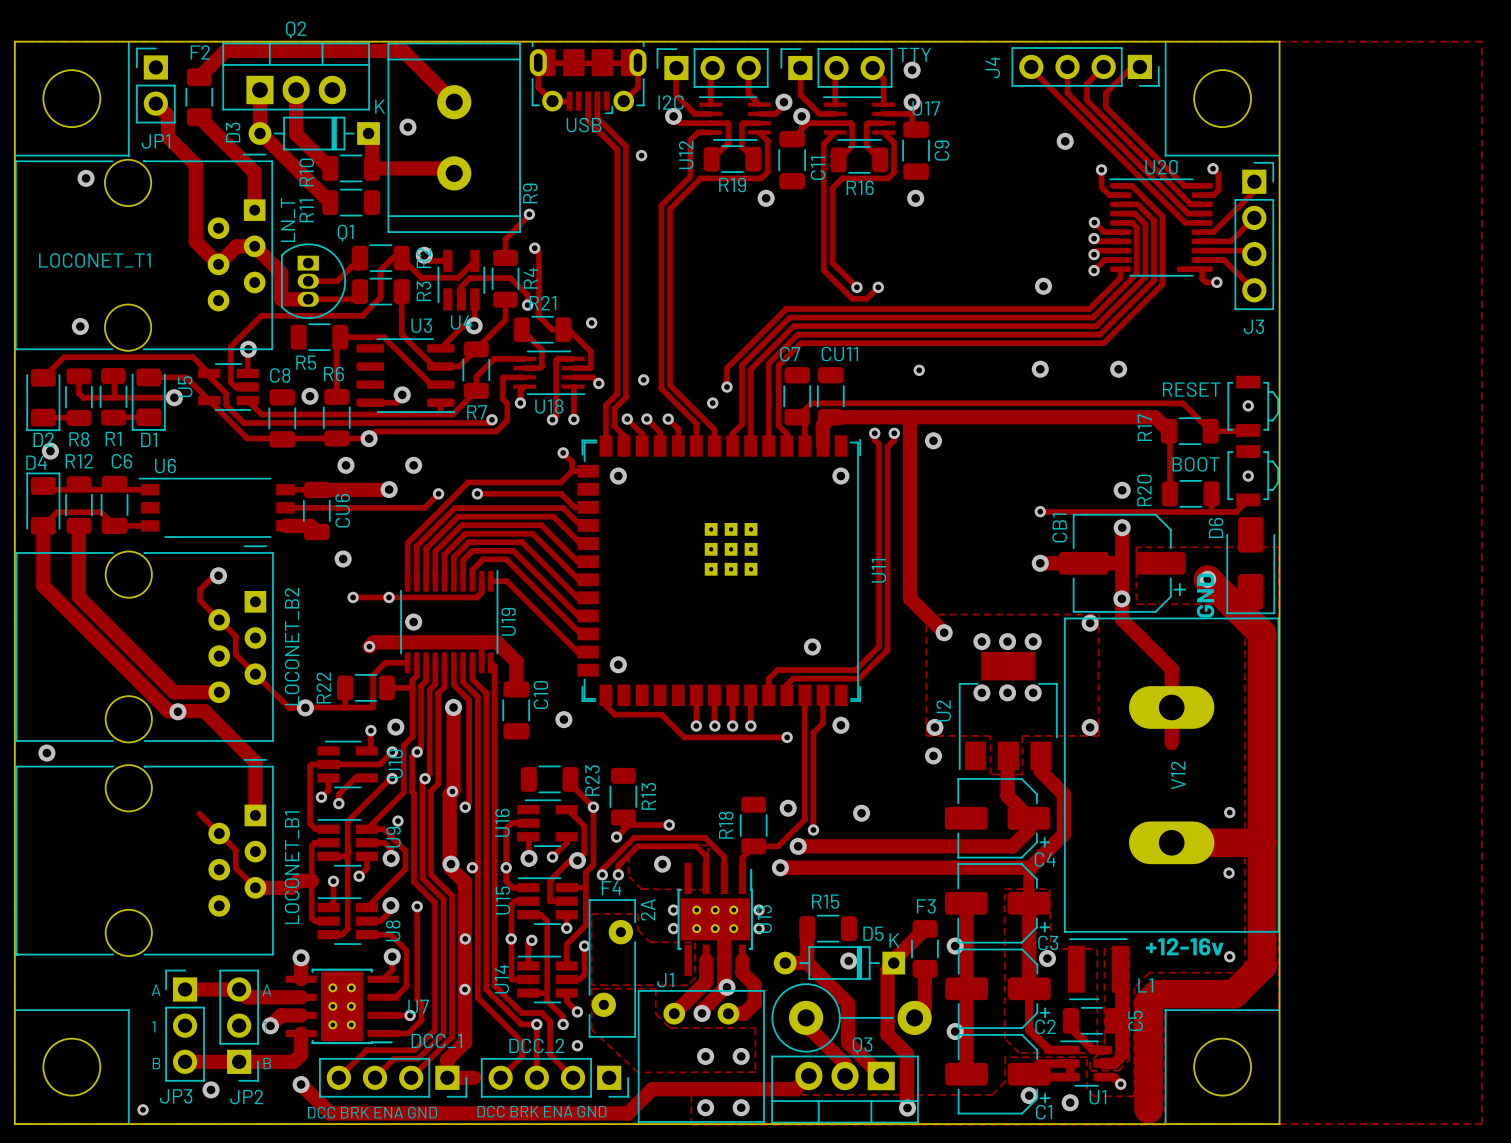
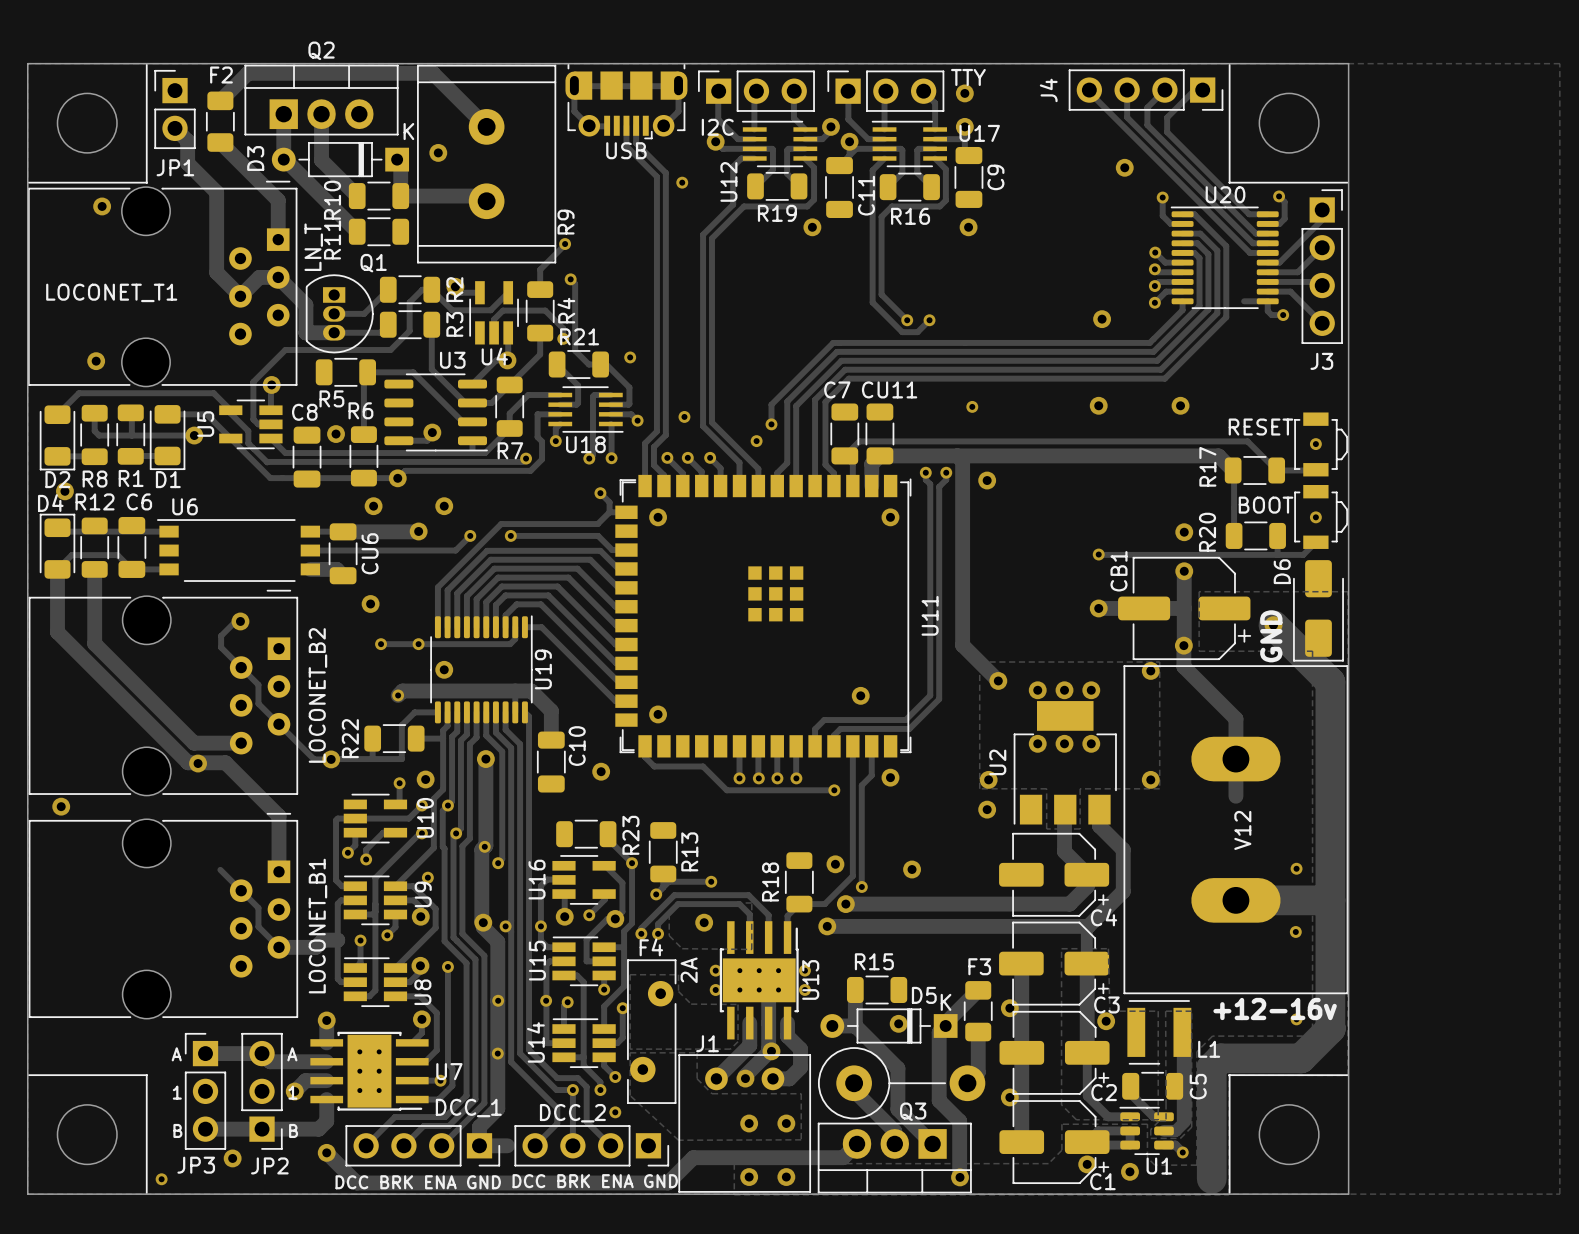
U11 footprint: [577, 435, 862, 707] -> [615, 474, 912, 758]

